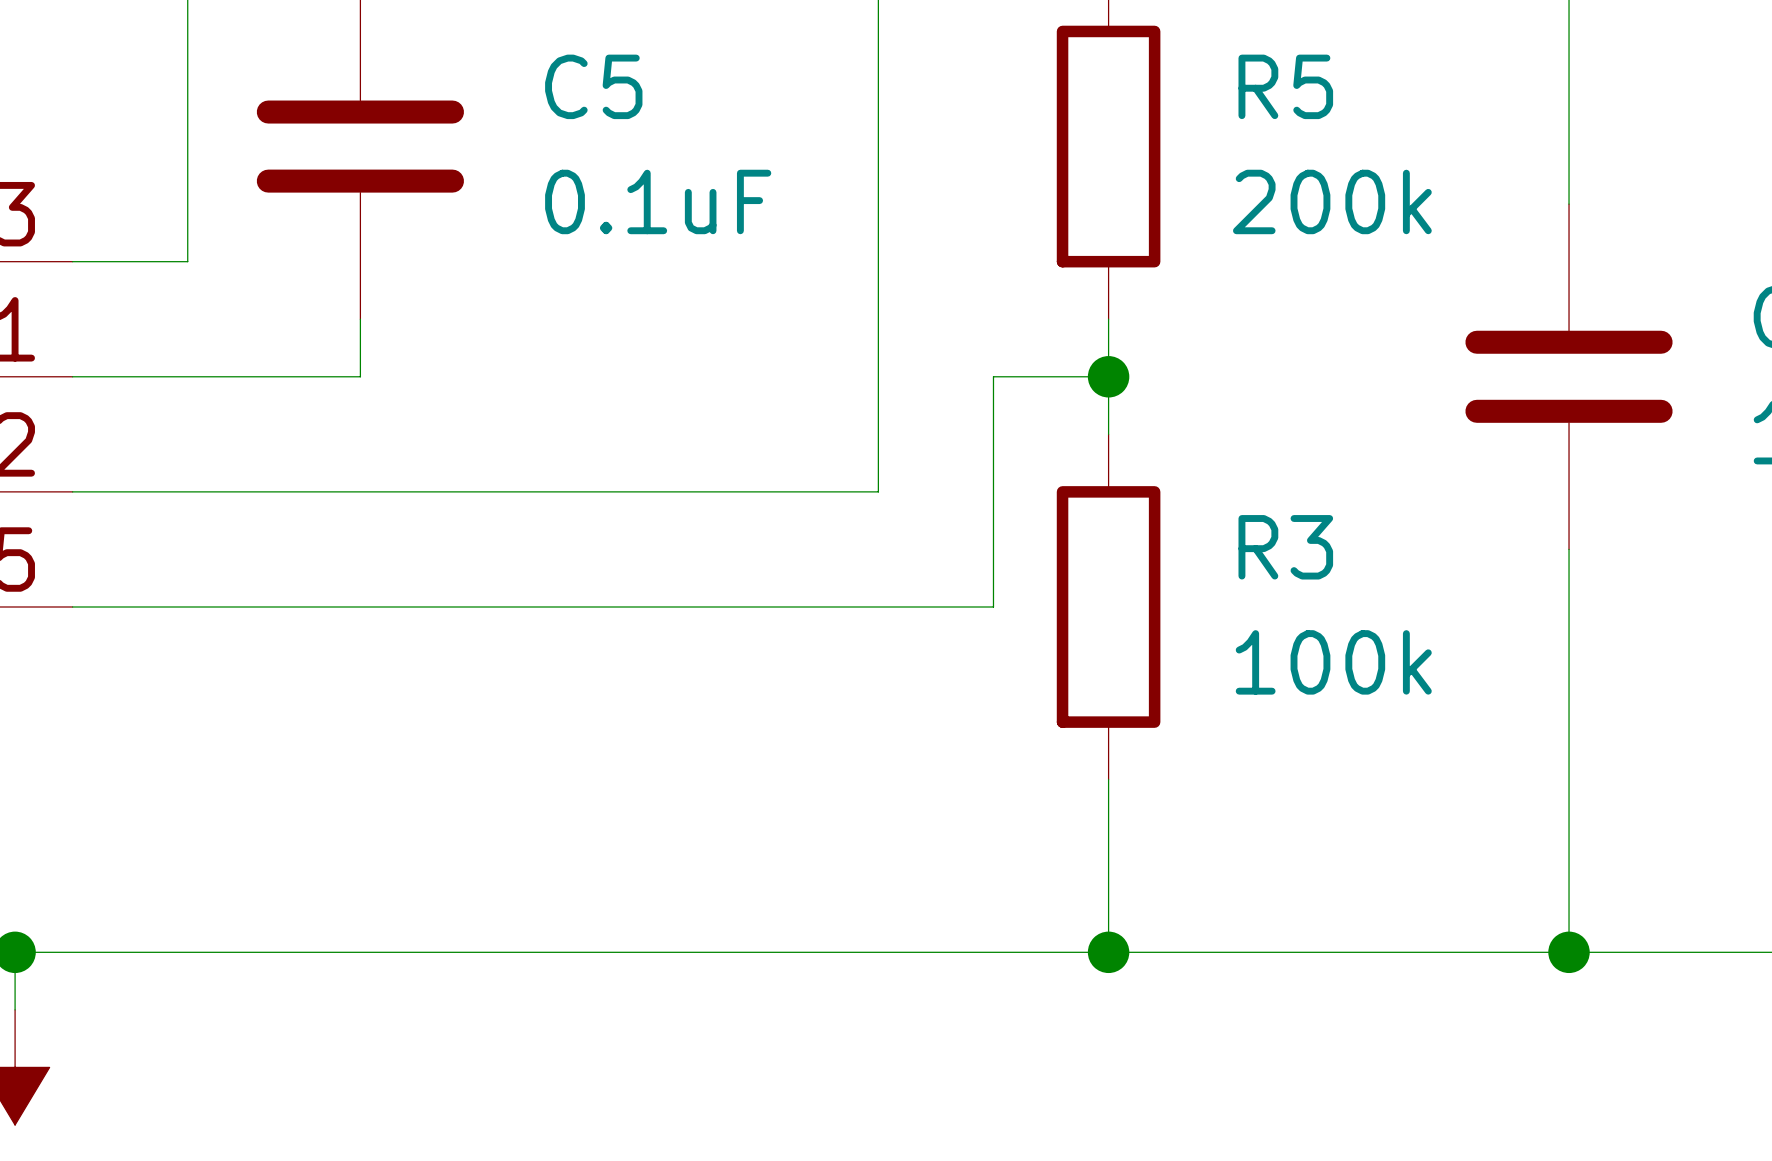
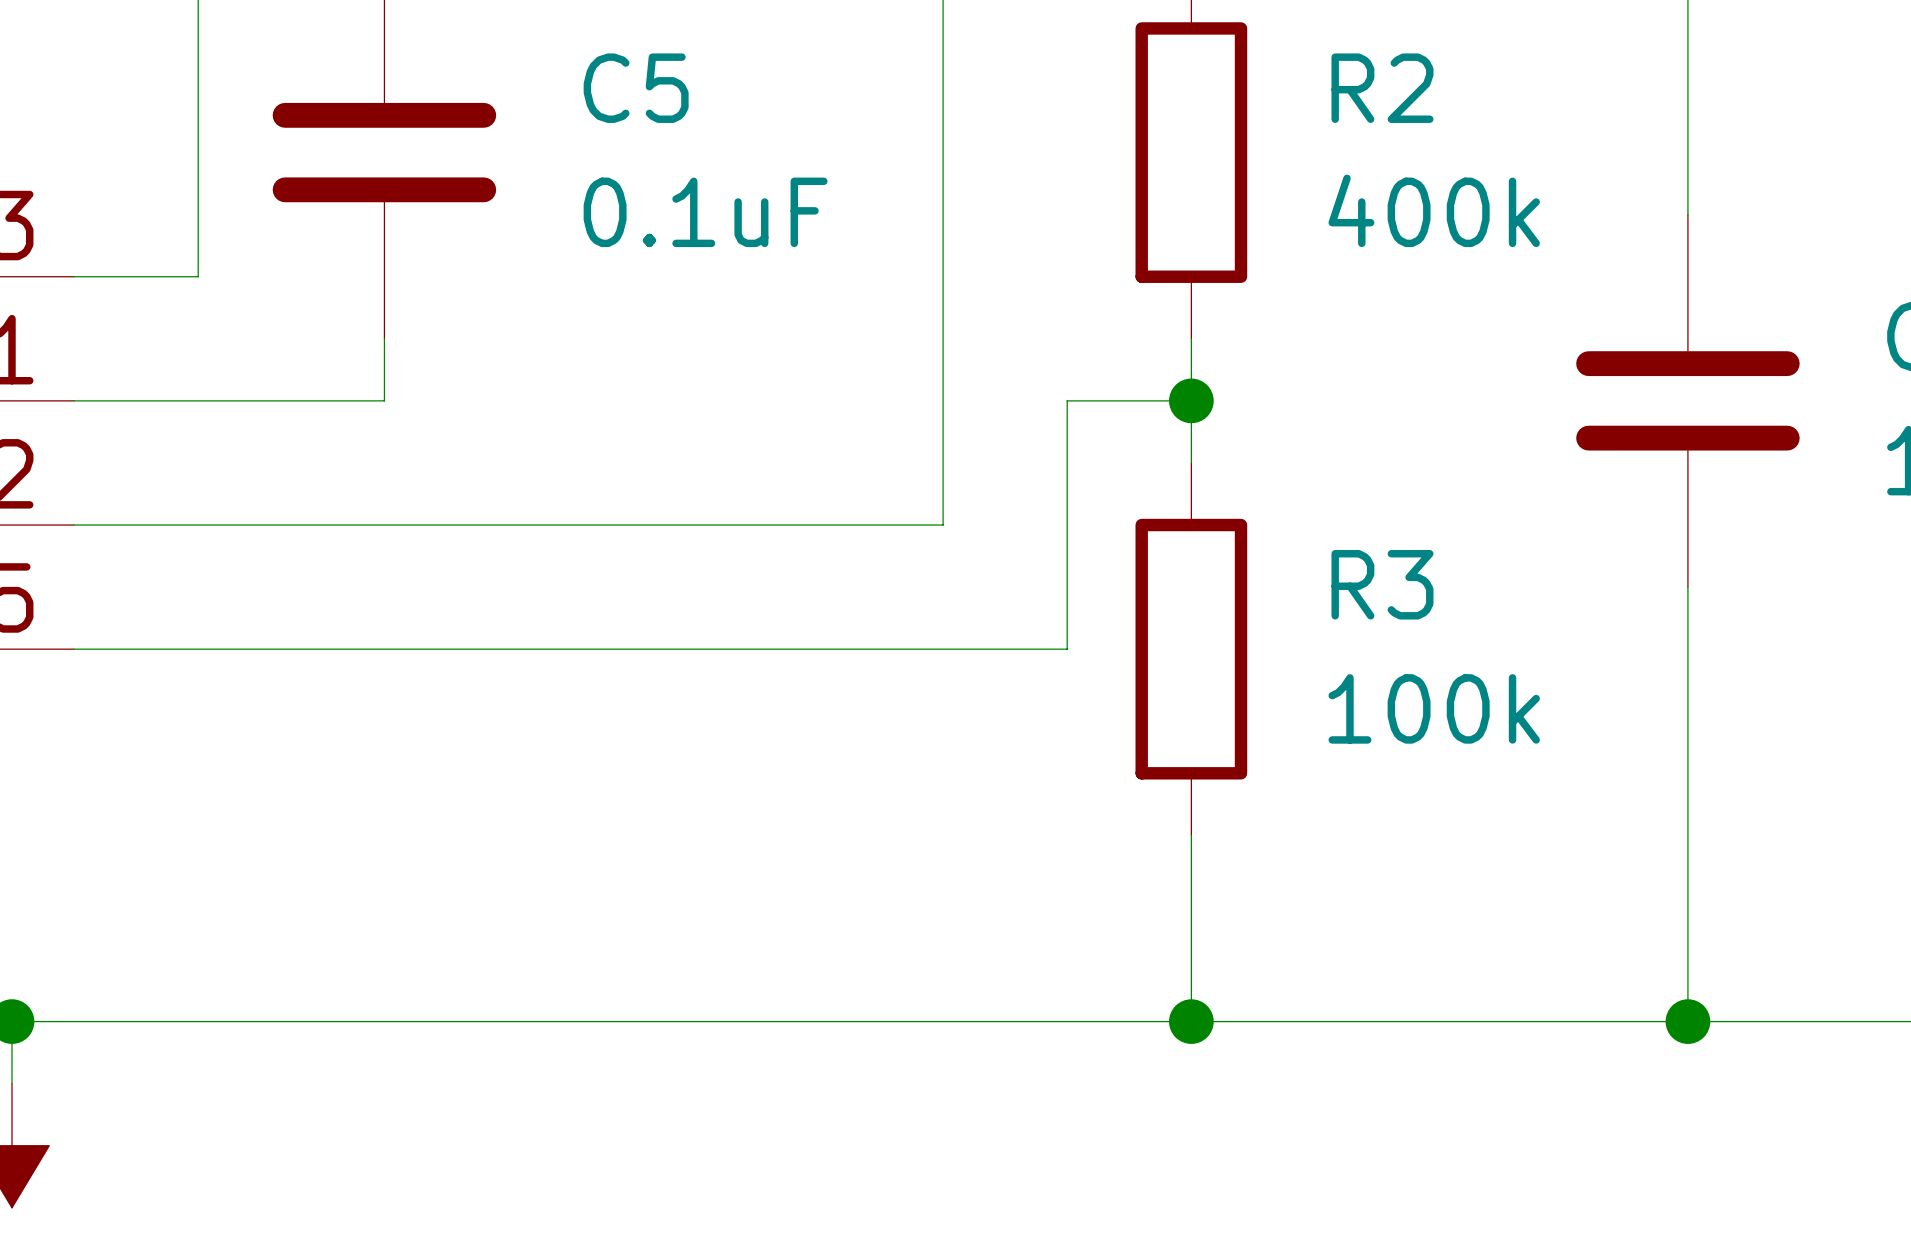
R5 name: R5 (1285, 86) -> R2 (1382, 88)
R5 value: 200k (1332, 201) -> 400k (1434, 210)

